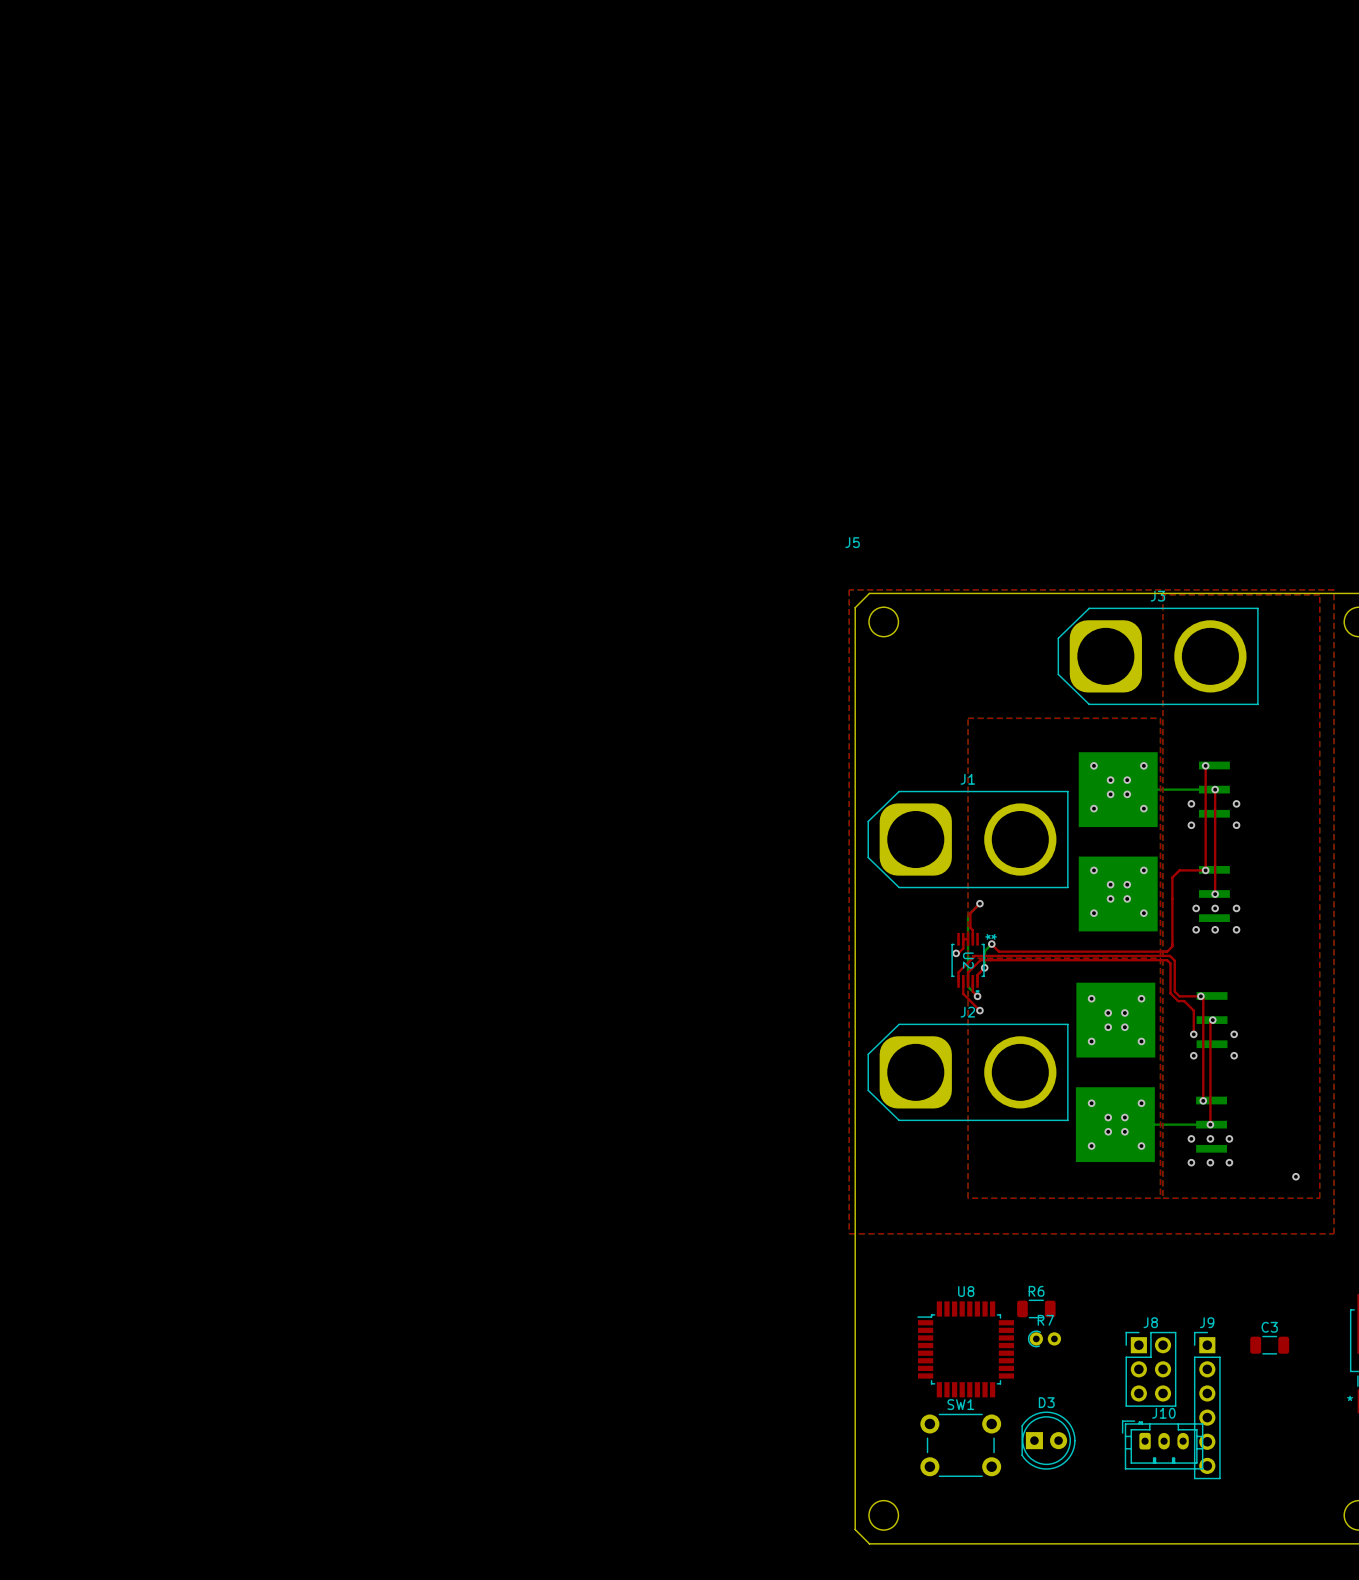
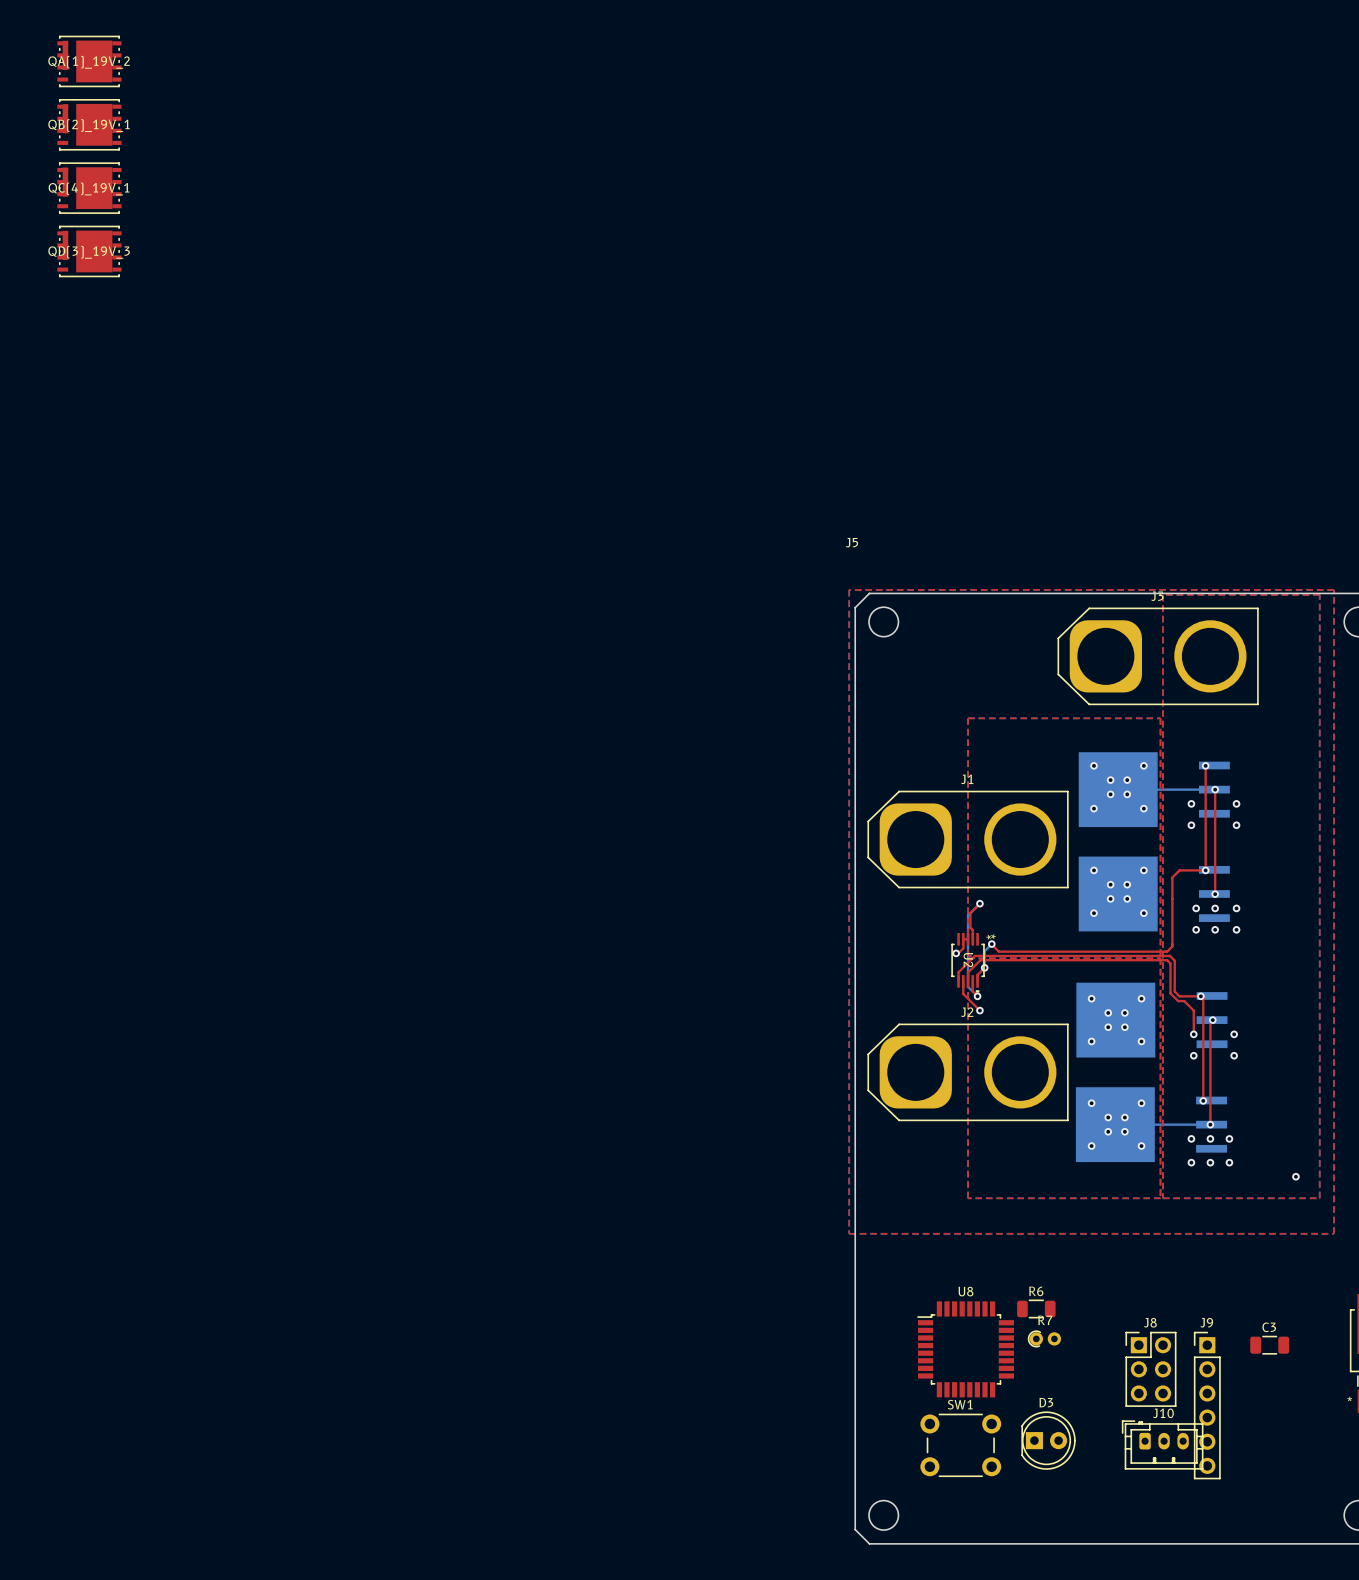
QA(1)_19V_2: none -> (89, 61)
QB(2)_19V_1: none -> (89, 124)
QC(4)_19V_1: none -> (89, 188)
QD(3)_19V_3: none -> (89, 251)

